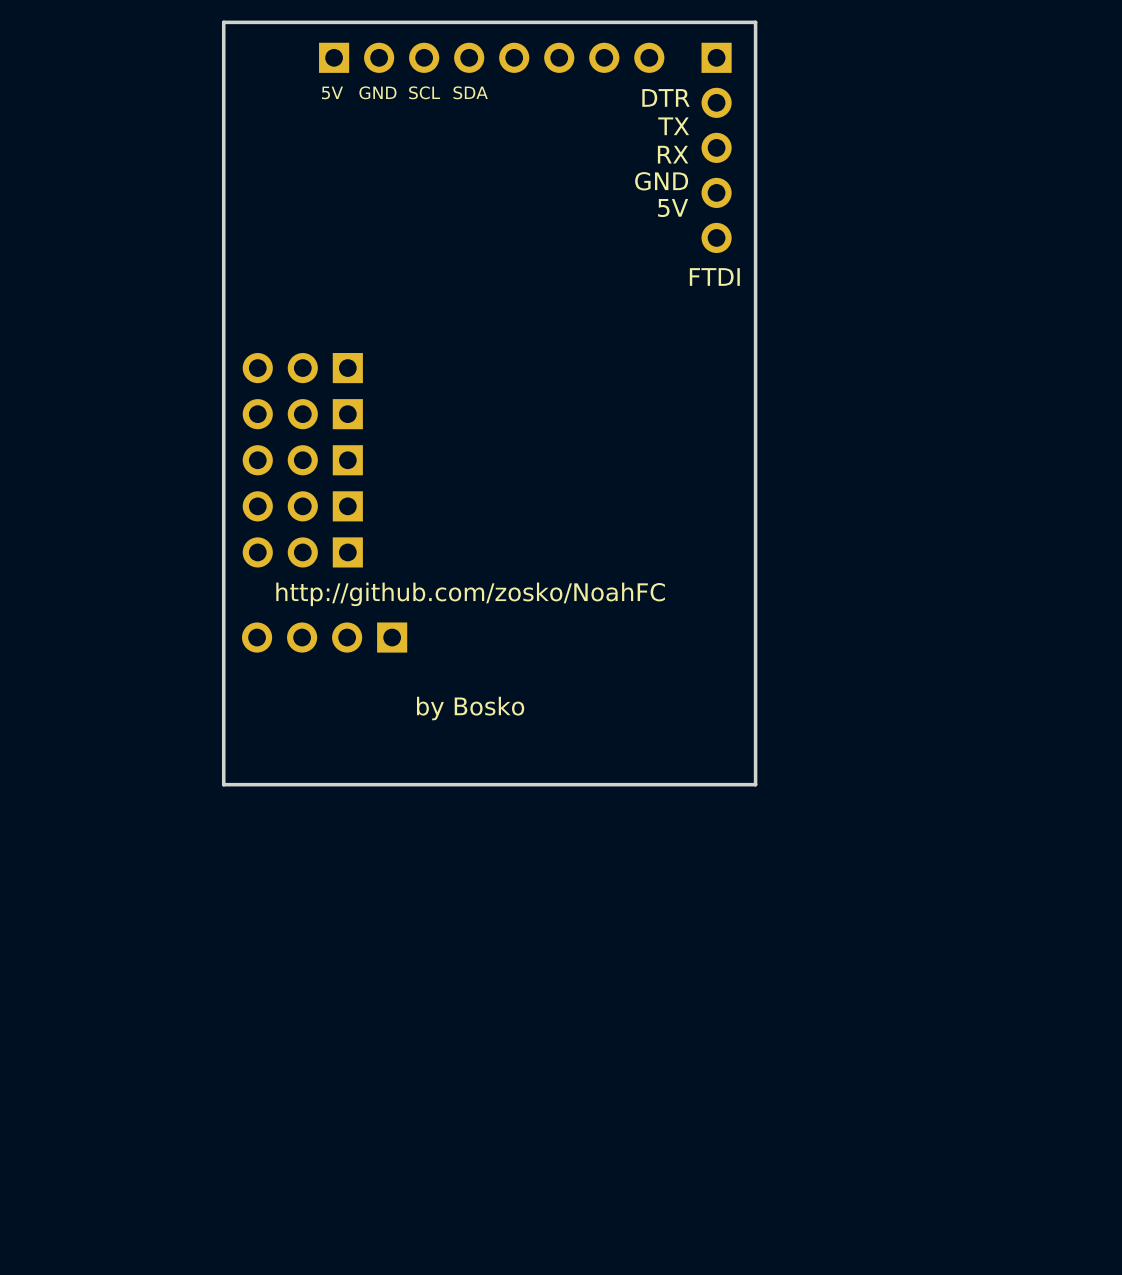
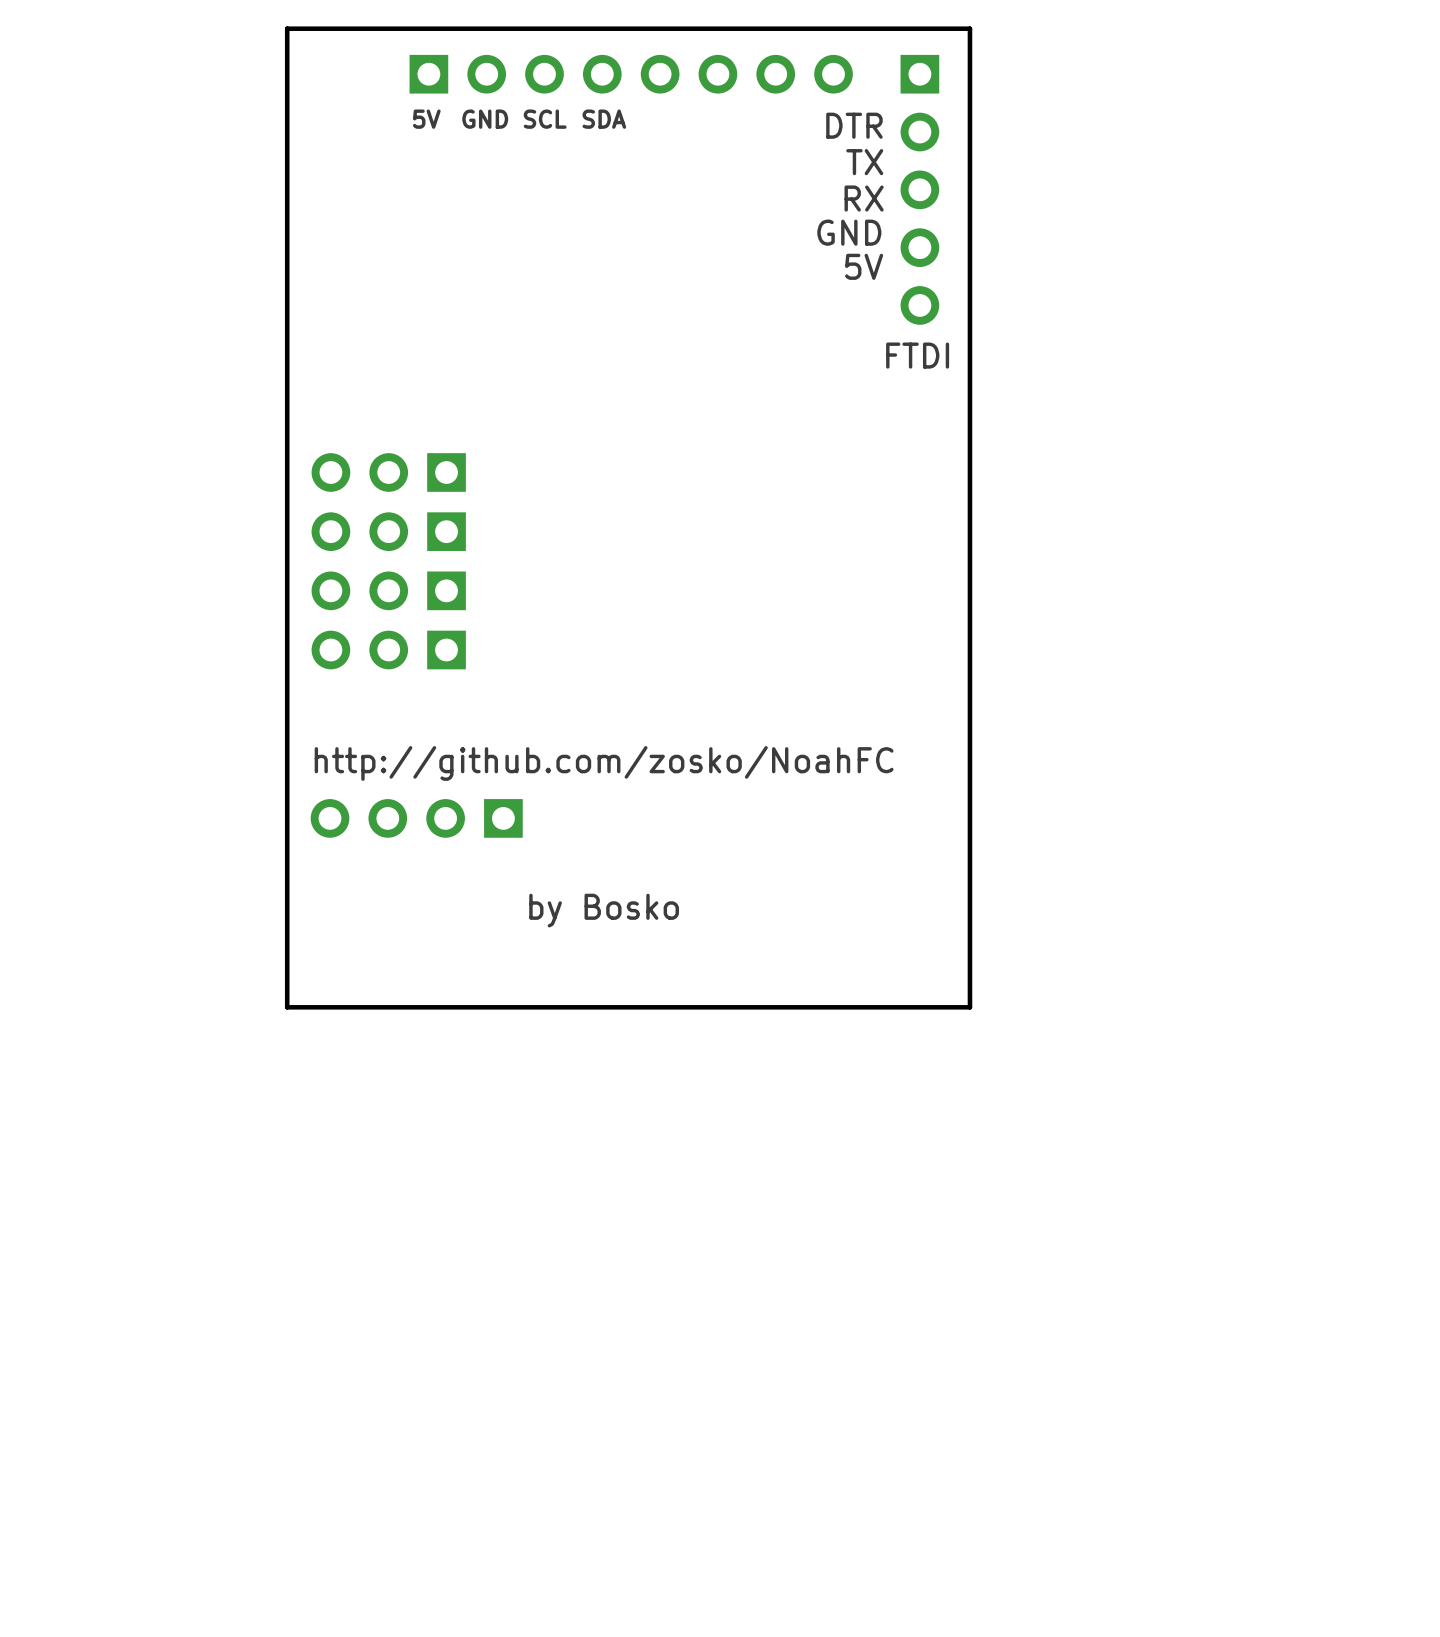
part: (302, 552) -> none

